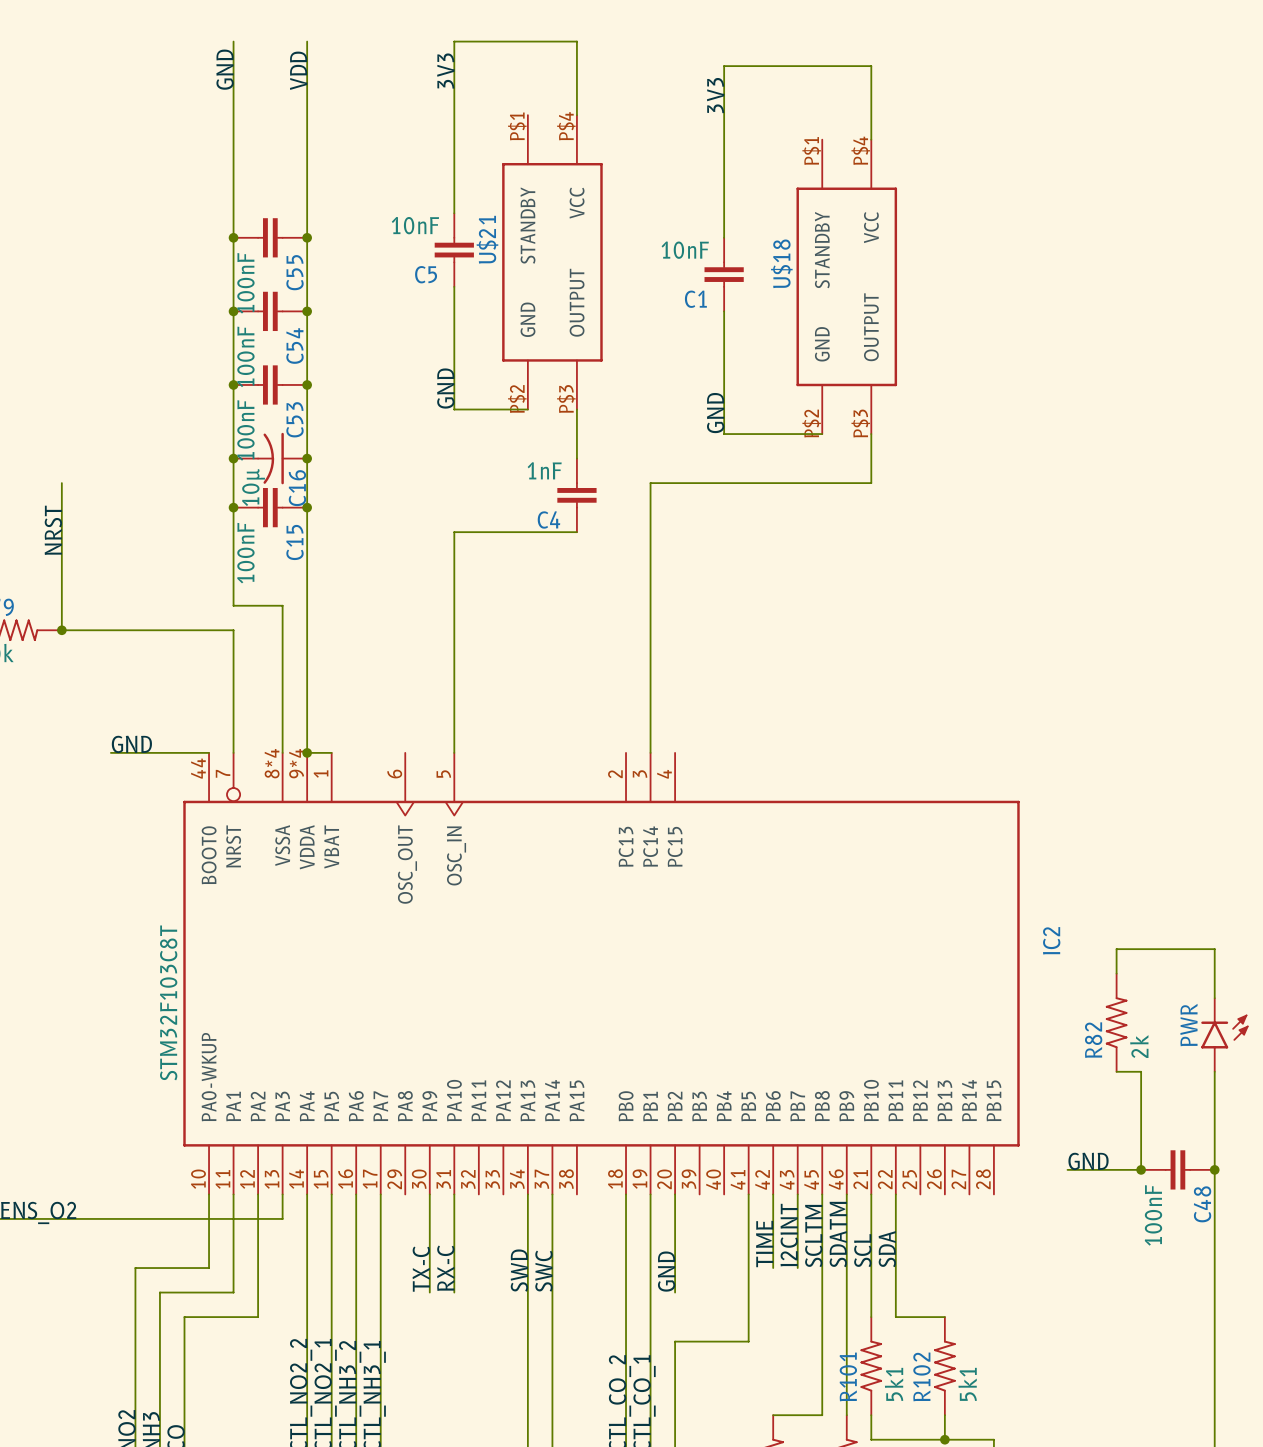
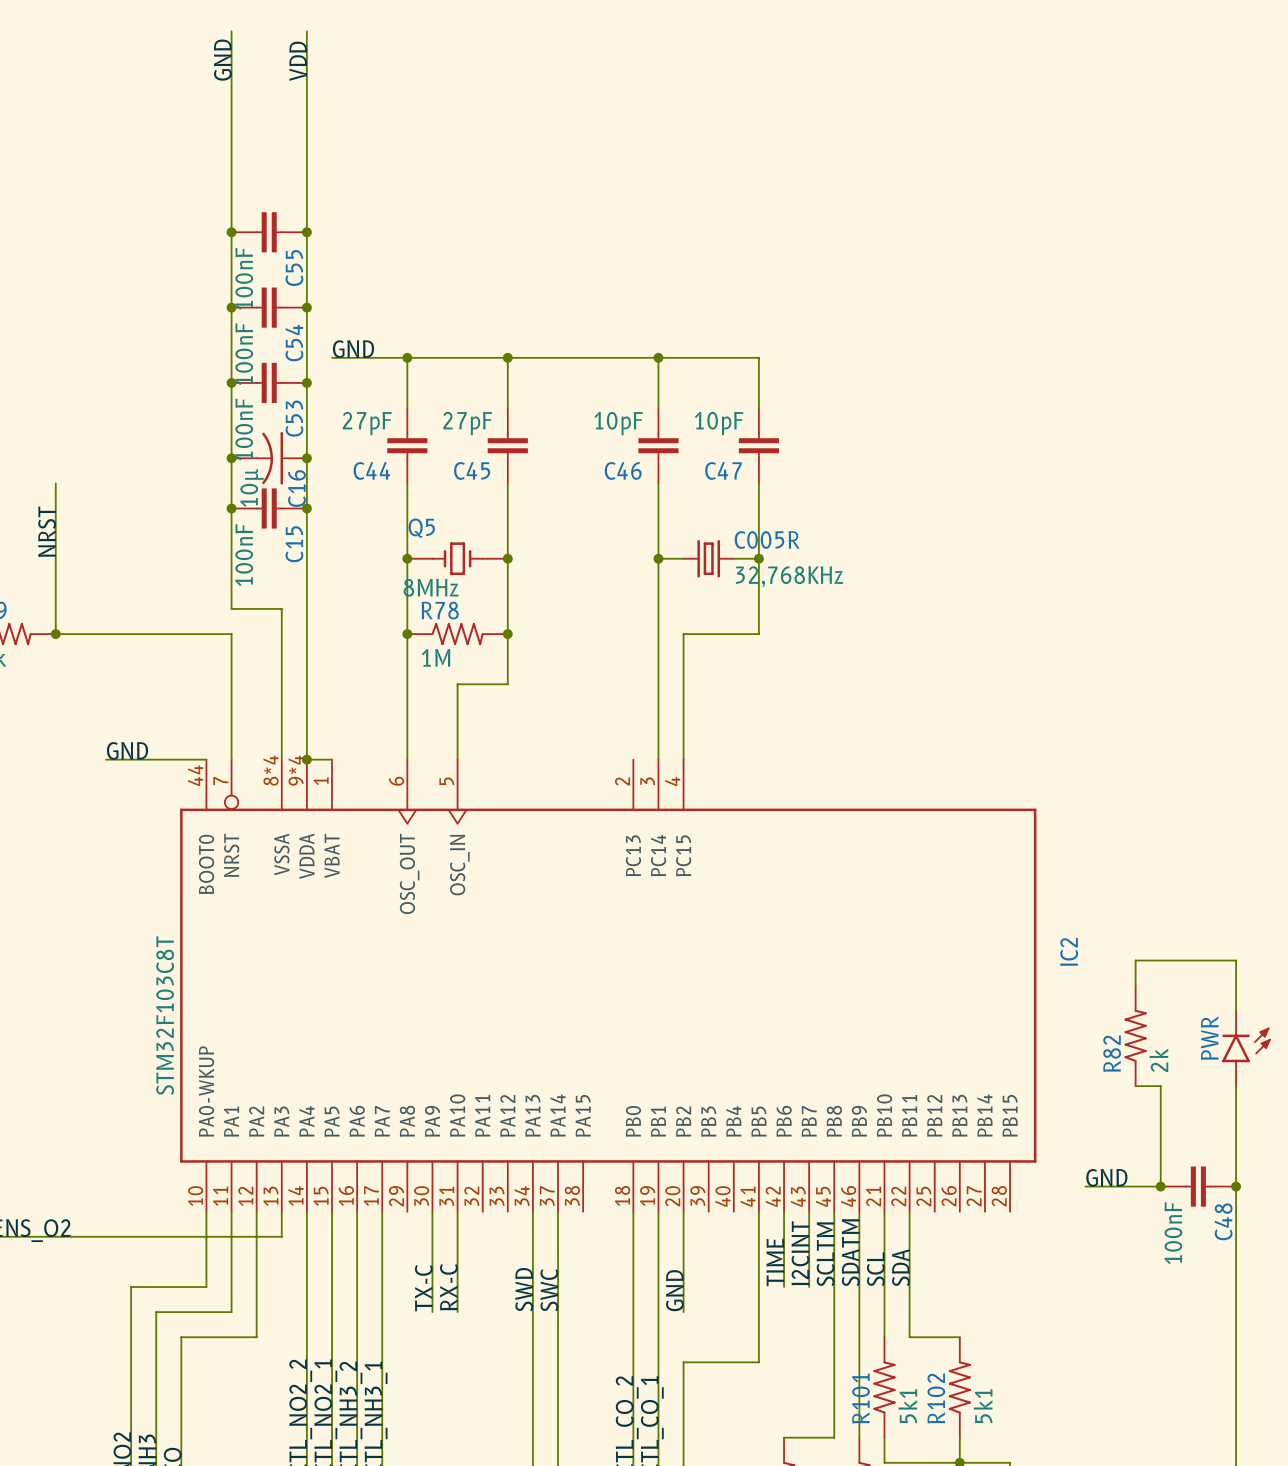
label: 3V3 (445, 71) -> none
label: 3V3 (715, 95) -> none
wire: (576, 115) (576, 41) (454, 41) (454, 213) -> none
wire: (871, 139) (871, 66) (724, 66) (724, 237) -> none
C5: 10nF (454, 250) -> none
U$21: (552, 262) -> none
C1: 10nF (724, 274) -> none
wire: (454, 286) (454, 409) (527, 409) -> none
U$18: (846, 286) -> none
wire: (724, 311) (724, 434) (822, 434) -> none
wire: none -> (332, 357) (758, 357) (758, 408)
wire: none -> (407, 357) (407, 408)
junction: none -> (407, 357)
junction: none -> (507, 357)
wire: none -> (658, 357) (658, 408)
junction: none -> (658, 357)
label rotation: 0° (445, 388) -> 90° clockwise (353, 349)
label position: GND (445, 388) -> GND (353, 349)
wire: (576, 409) (576, 458) -> (507, 357) (507, 408)
label: GND (715, 413) -> none
wire: (871, 434) (871, 483) (650, 483) -> none
C44: none -> 27pF (407, 445)
C45: none -> 27pF (507, 445)
C46: none -> 10pF (658, 445)
C47: none -> 10pF (758, 445)
wire: none -> (407, 483) (407, 759)
wire: none -> (758, 483) (758, 634) (683, 634) (683, 759)
C4: 1nF (576, 495) -> none
wire: (576, 532) (454, 532) (454, 679) -> (507, 483) (507, 684) (457, 684)
junction: none -> (407, 558)
Q5: none -> 8MHz (457, 558)
junction: none -> (507, 558)
wire: none -> (658, 558) (683, 558)
junction: none -> (658, 558)
C005R: none -> 32,768KHz (708, 558)
wire: none -> (733, 558) (758, 558)
junction: none -> (758, 558)
junction: none -> (407, 634)
R78: none -> 1M (457, 634)
junction: none -> (507, 634)

